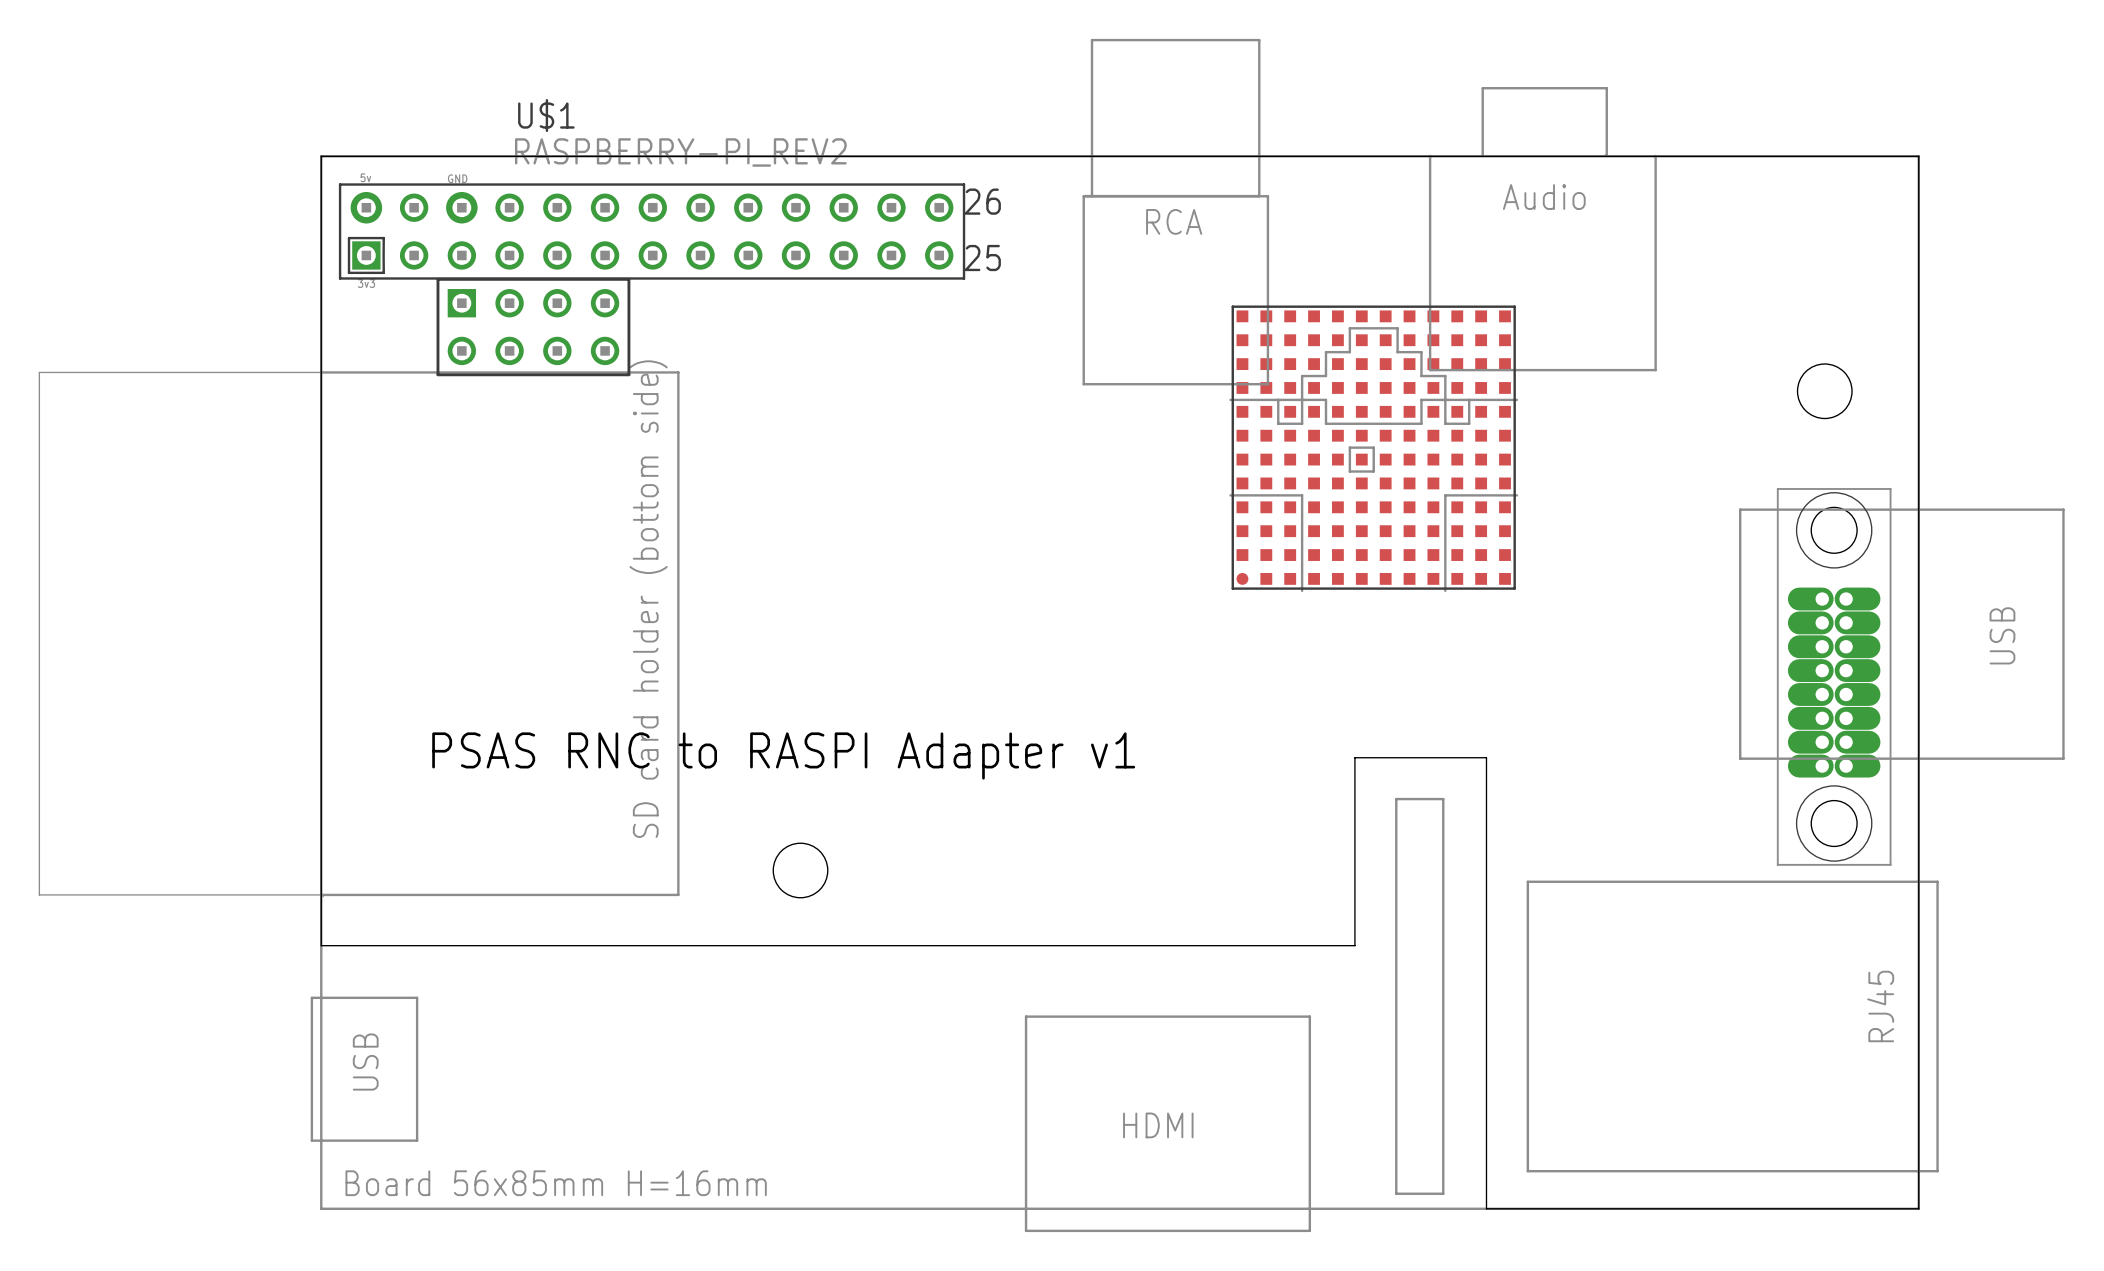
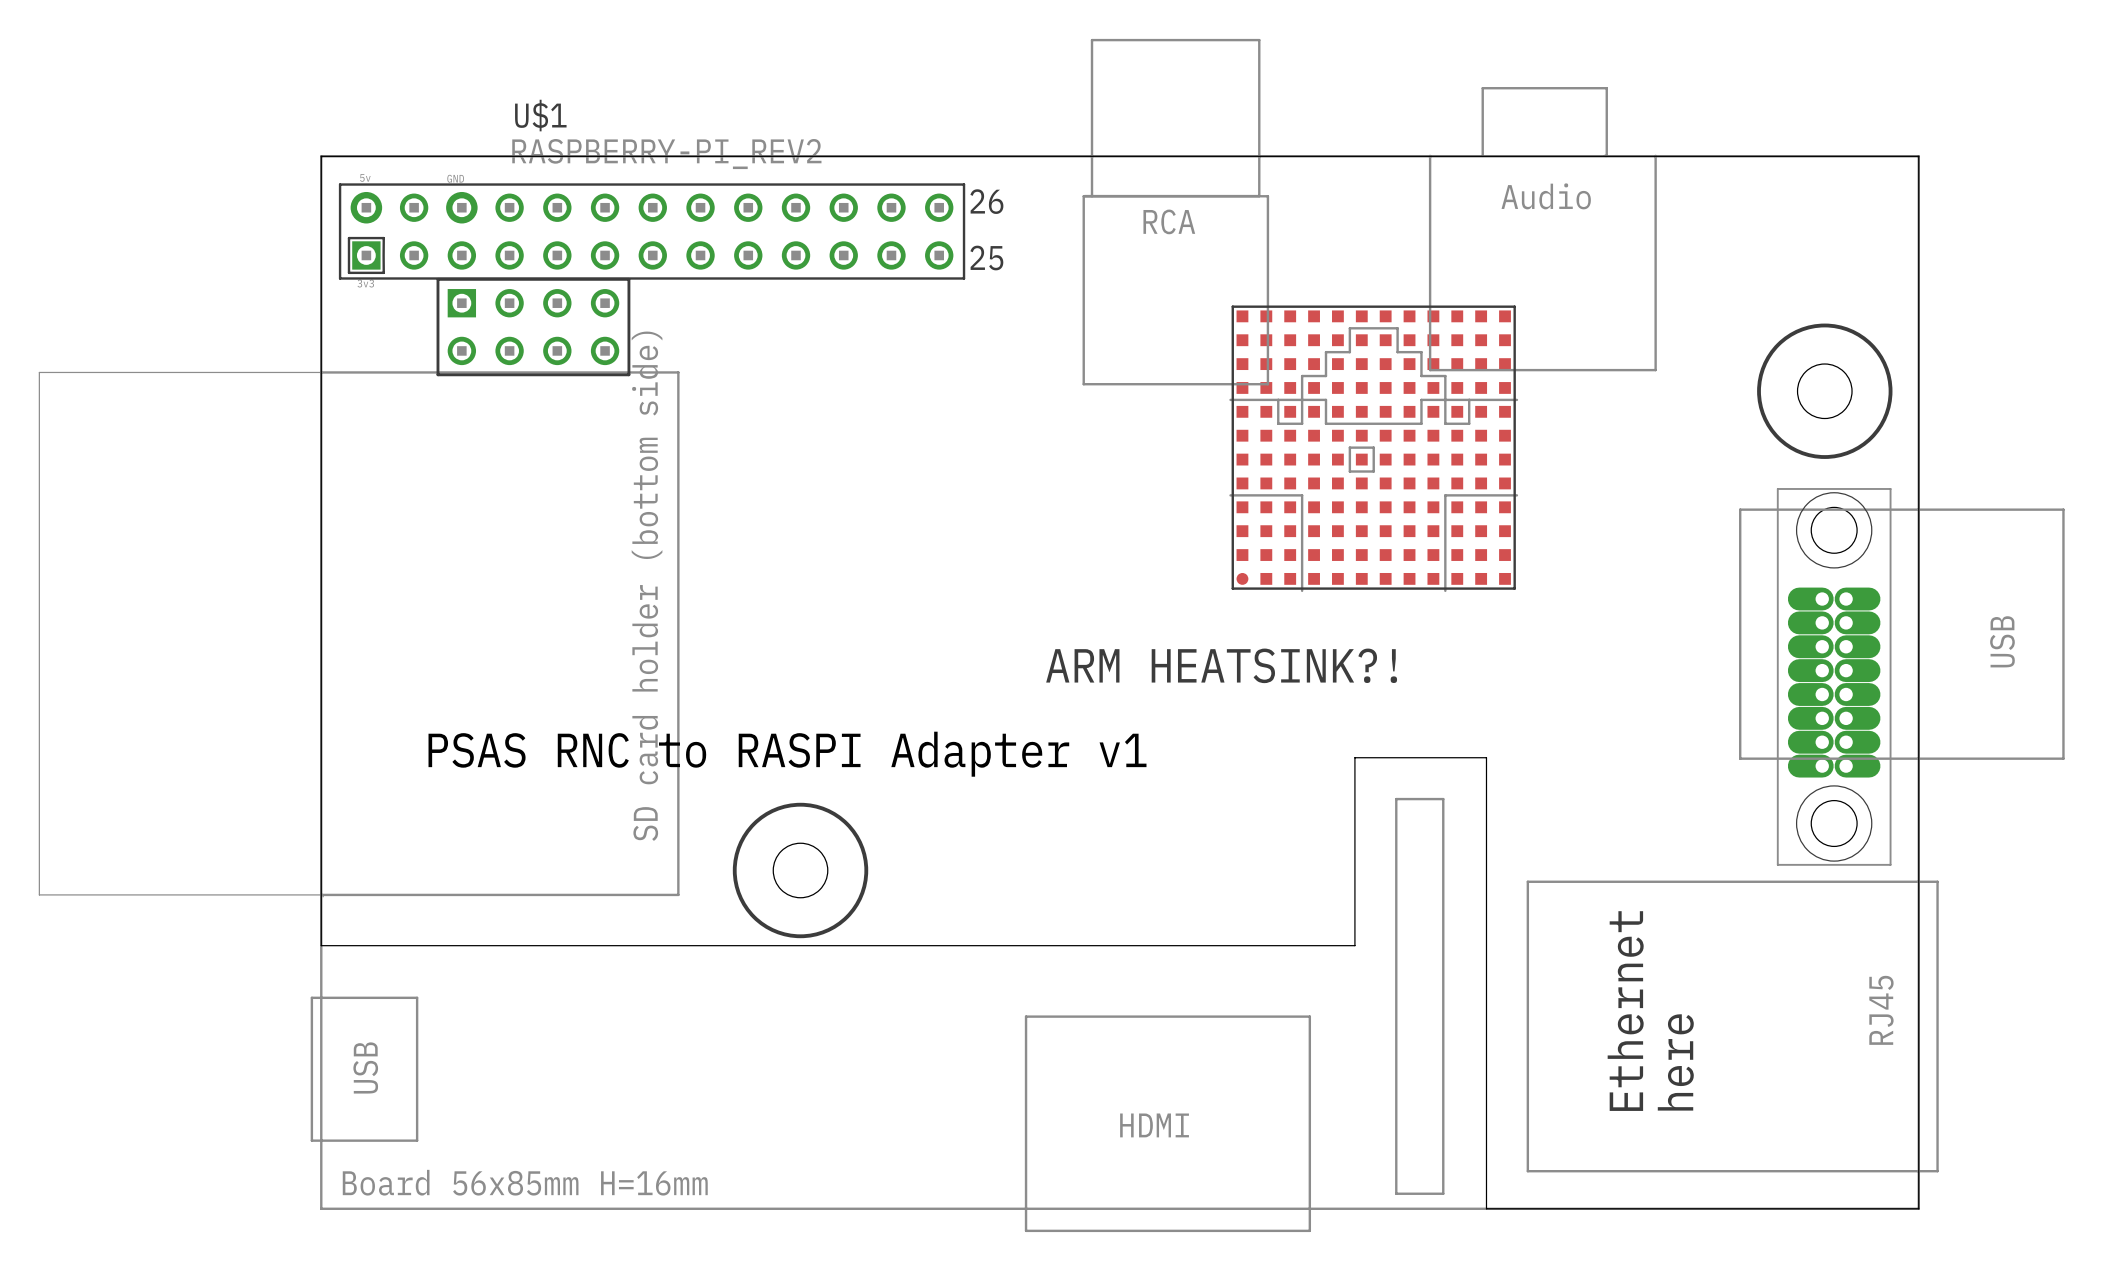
drawing: none -> [1757, 323, 1893, 459]
text: none -> ARM HEATSINK?! (1221, 665)
drawing: none -> [732, 802, 869, 939]
text: none -> Ethernet (1625, 1011)
text: none -> here (1675, 1062)

